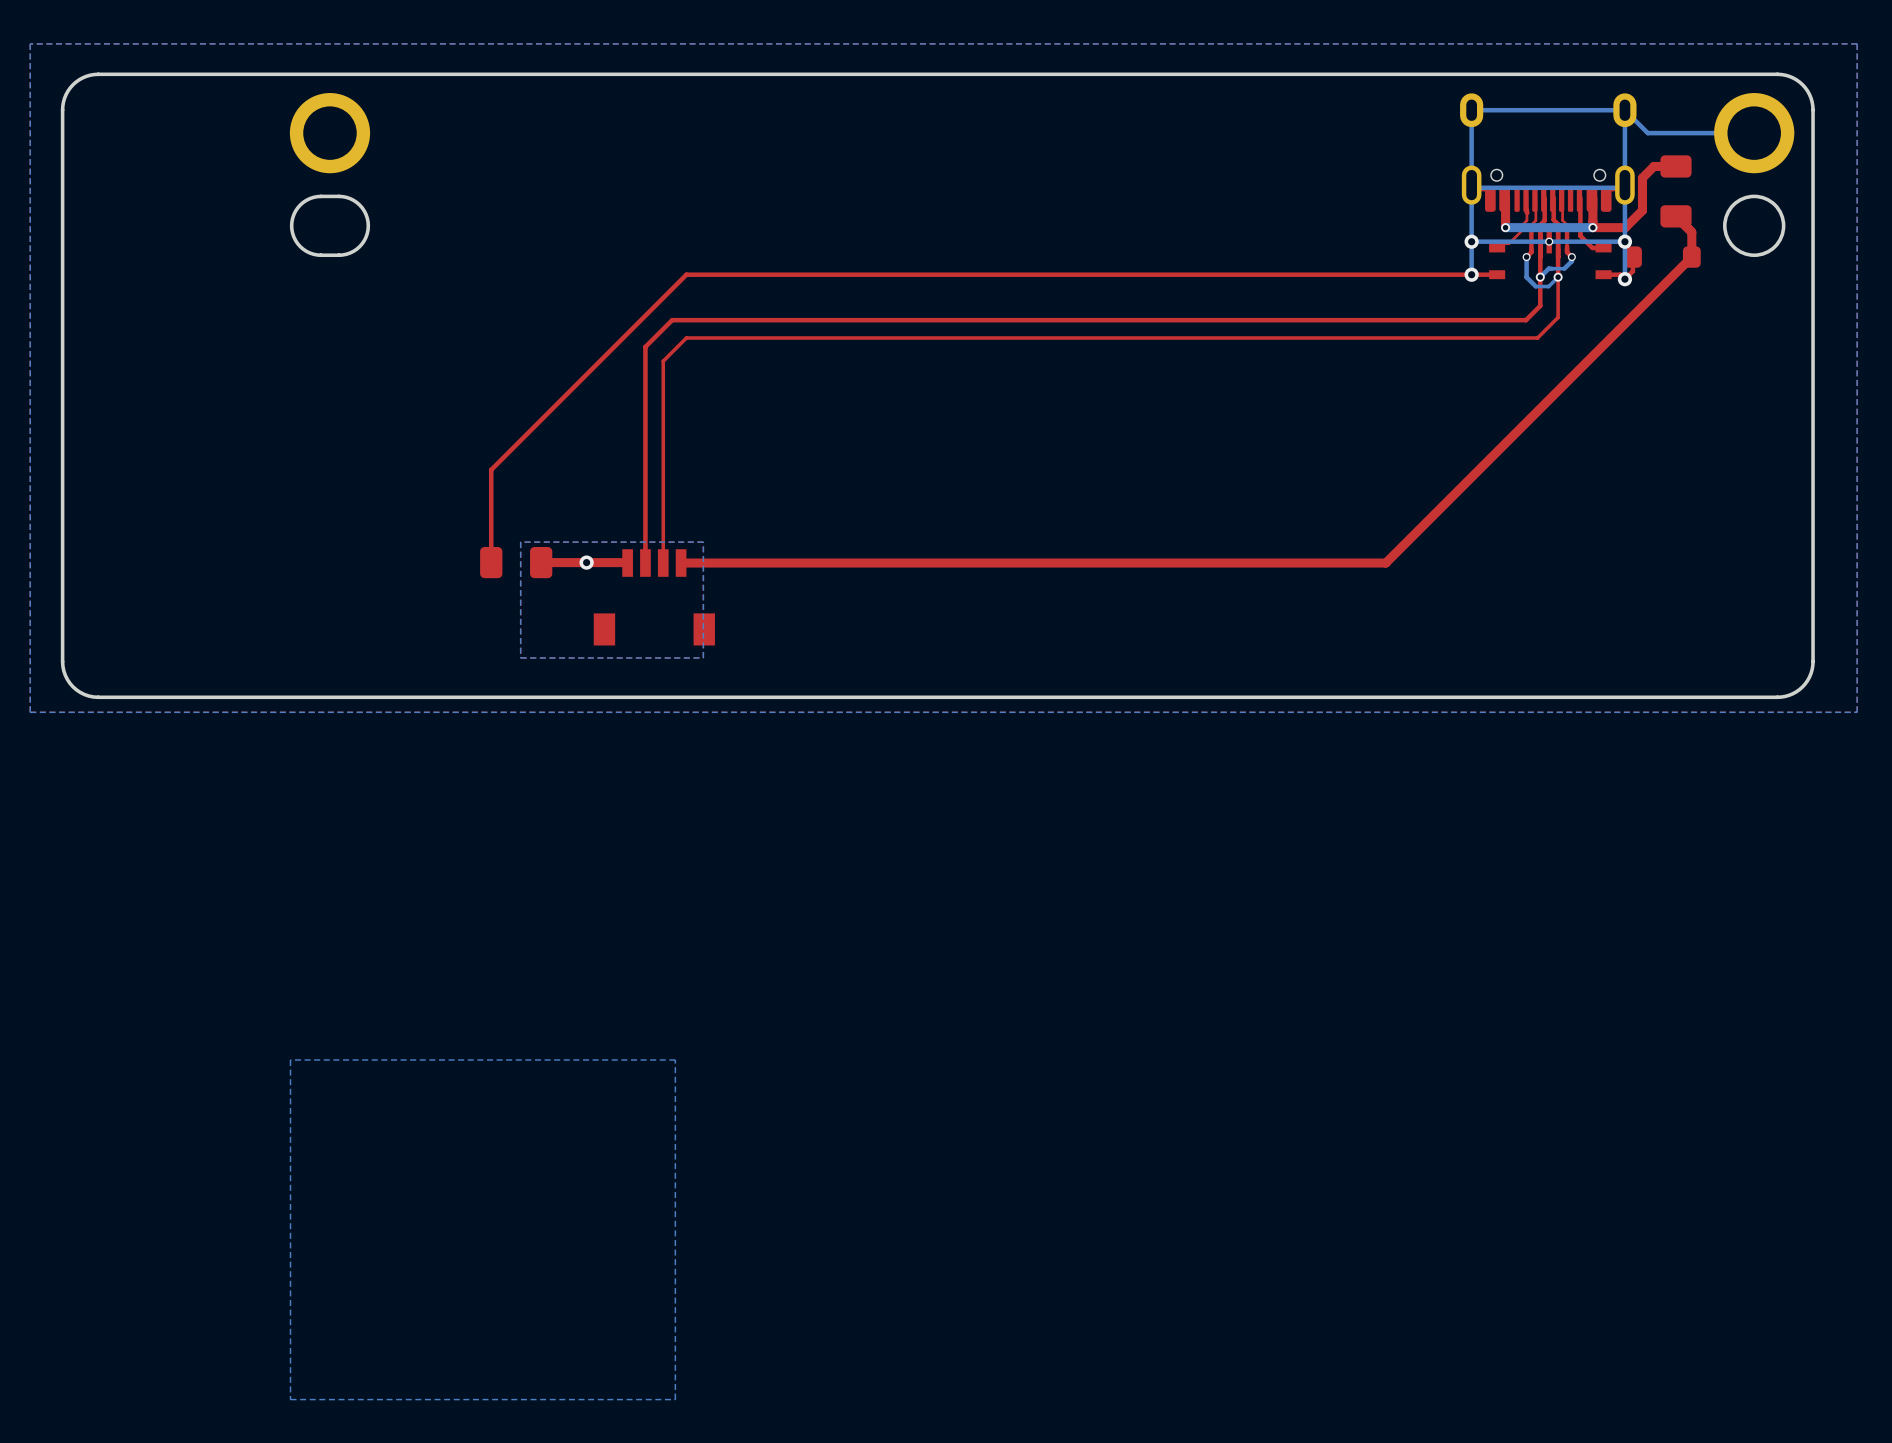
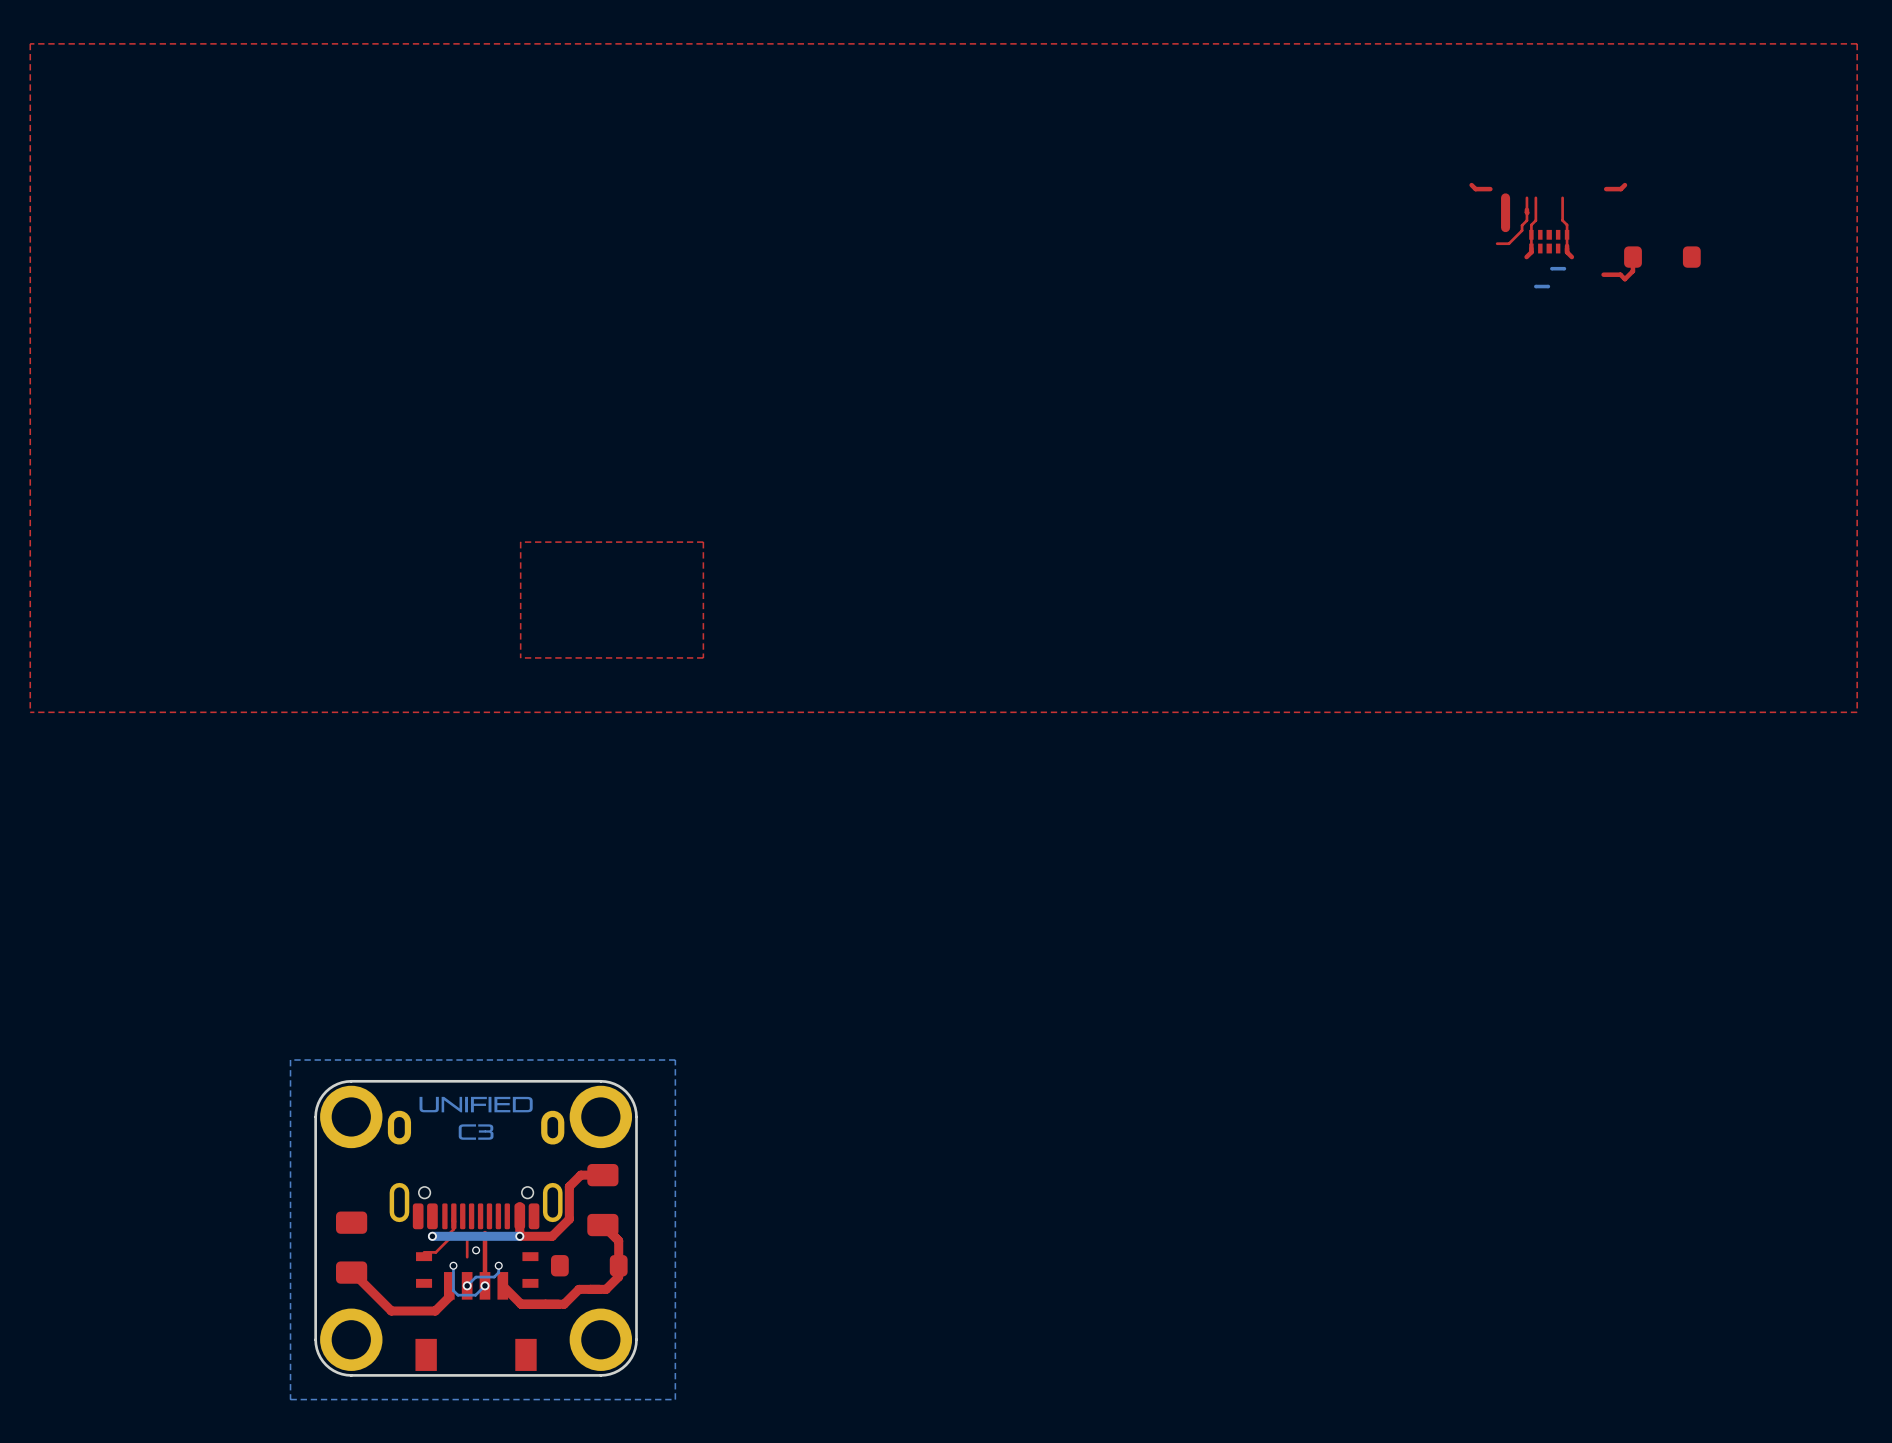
bottom zone outline: (1857, 43) (1857, 712) (30, 712) (30, 43) (1857, 43) -> none
bottom track: (1624, 110) (1624, 279) -> none
bottom track: (1624, 110) (1647, 133) (1754, 133) -> none
bottom track: (1624, 110) (1471, 110) (1471, 274) -> none
part: (1548, 152) -> none
top track: (1676, 166) (1654, 166) (1642, 177) (1642, 210) (1625, 227) (1592, 227) (1592, 197) -> none
bottom track: (1624, 185) (1622, 187) (1474, 187) (1471, 185) -> none
part: (1676, 191) -> none
top track: (1544, 197) (1544, 220) (1540, 224) -> none
top track: (1553, 197) (1553, 219) (1558, 224) (1558, 317) (1537, 337) (686, 337) (663, 361) (663, 563) -> none
top track: (1676, 216) (1691, 232) (1691, 257) (1385, 563) (681, 563) -> none
top track: (1540, 224) (1540, 305) (1526, 320) (672, 320) (645, 346) (645, 563) -> none
via: (1505, 227) -> none
bottom track: (1592, 227) (1505, 227) -> none
via: (1592, 227) -> none
top track: (1580, 233) (1580, 197) (1580, 235) (1592, 247) (1603, 247) -> none
via: (1471, 241) -> none
via: (1549, 241) -> none
bottom track: (1624, 241) (1471, 241) -> none
via: (1624, 241) -> none
bottom track: (1526, 257) (1526, 277) (1535, 286) -> none
via: (1526, 257) -> none
bottom track: (1571, 257) (1571, 261) (1564, 268) -> none
via: (1571, 257) -> none
part: (1497, 261) -> none
part: (1603, 261) -> none
bottom track: (1551, 268) (1548, 268) (1540, 277) -> none
via: (1471, 274) -> none
top track: (1497, 274) (686, 274) (491, 469) (491, 562) -> none
via: (1540, 277) -> none
bottom track: (1558, 277) (1548, 286) -> none
via: (1558, 277) -> none
via: (1624, 279) -> none
part: (937, 385) -> none
bottom zone outline: (703, 542) (703, 657) (520, 657) (520, 542) (703, 542) -> none
part: (516, 562) -> none
top track: (541, 562) (627, 563) -> none
via: (586, 562) -> none
part: (654, 597) -> none
board edge: none -> (600, 1081) (351, 1081) (337, 1084) (326, 1091) (318, 1103) (315, 1116) (315, 1339) (318, 1353) (326, 1364) (337, 1372) (351, 1375) (600, 1375) (614, 1372) (626, 1364) (633, 1353) (636, 1339) (636, 1112) (631, 1099) (622, 1088) (610, 1082) (600, 1081)
part: none -> (351, 1116)
part: none -> (600, 1116)
part: none -> (476, 1118)
part: none -> (476, 1169)
top track: none -> (602, 1175) (580, 1175) (569, 1186) (569, 1219) (552, 1236) (519, 1236) (519, 1206)
part: none -> (602, 1200)
top track: none -> (453, 1206) (453, 1229) (448, 1234) (448, 1239) (435, 1252) (424, 1252)
top track: none -> (602, 1225) (618, 1240) (618, 1276) (606, 1289) (578, 1289) (564, 1304) (521, 1304) (502, 1285) (502, 1282)
top track: none -> (467, 1233) (467, 1257)
top track: none -> (485, 1233) (484, 1285)
via: none -> (432, 1236)
bottom track: none -> (519, 1236) (432, 1236)
via: none -> (519, 1236)
part: none -> (351, 1247)
via: none -> (476, 1250)
bottom track: none -> (453, 1265) (453, 1290) (457, 1295) (475, 1295) (484, 1285)
via: none -> (453, 1265)
bottom track: none -> (498, 1265) (498, 1272) (494, 1277) (475, 1277) (467, 1285)
via: none -> (498, 1265)
part: none -> (589, 1265)
part: none -> (424, 1270)
part: none -> (530, 1270)
top track: none -> (351, 1271) (391, 1311) (435, 1311) (449, 1297) (449, 1285)
via: none -> (467, 1285)
via: none -> (484, 1285)
part: none -> (476, 1321)
part: none -> (351, 1339)
part: none -> (600, 1339)

